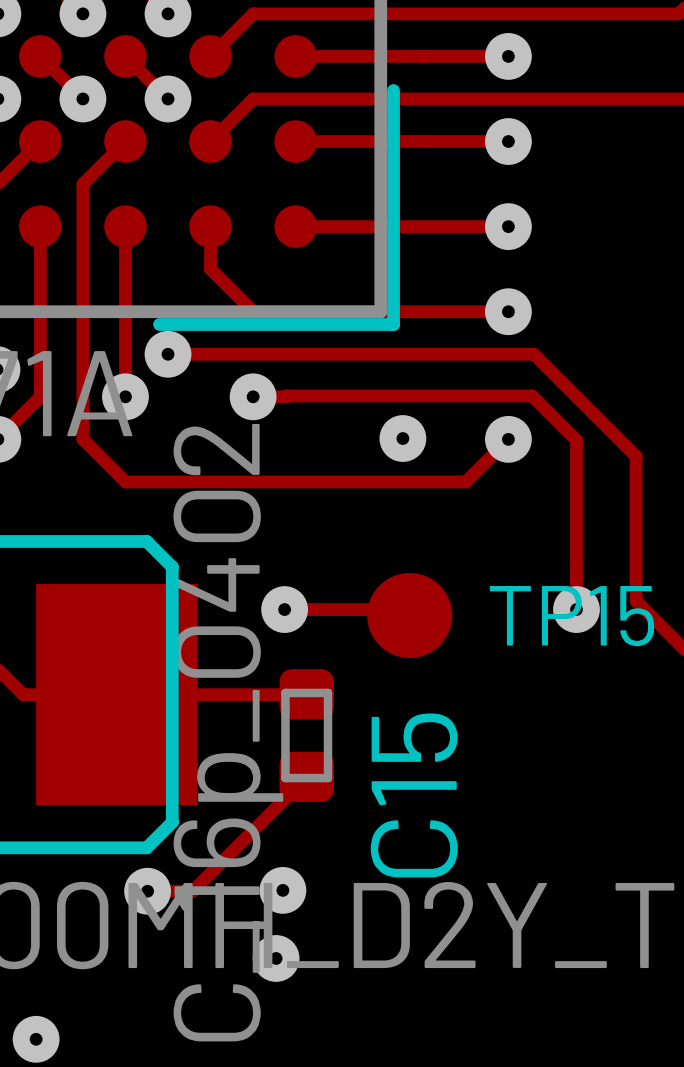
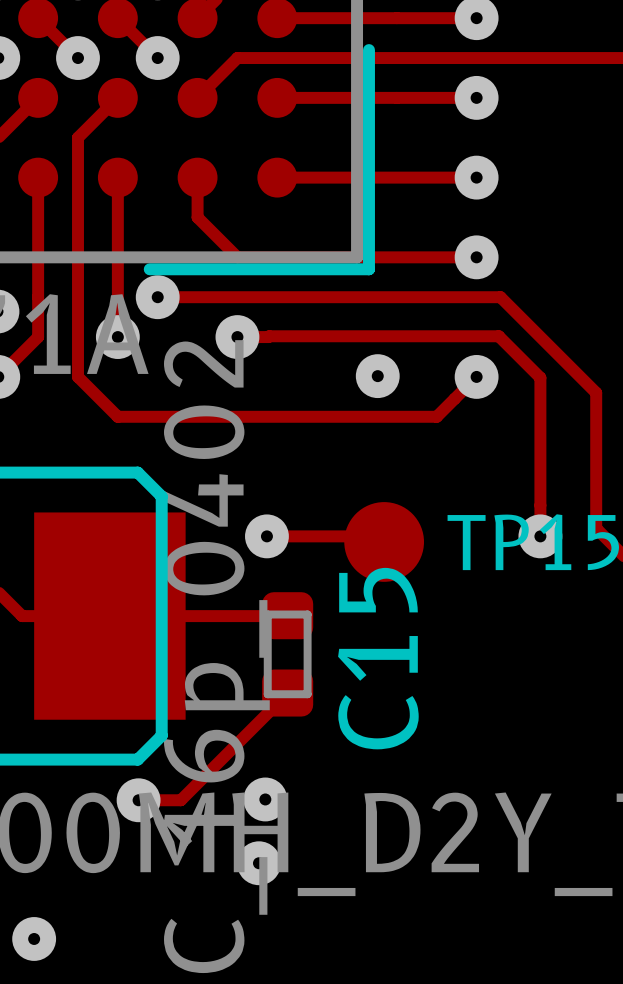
C15 name position: C15 (414, 795) -> C15 (378, 658)

